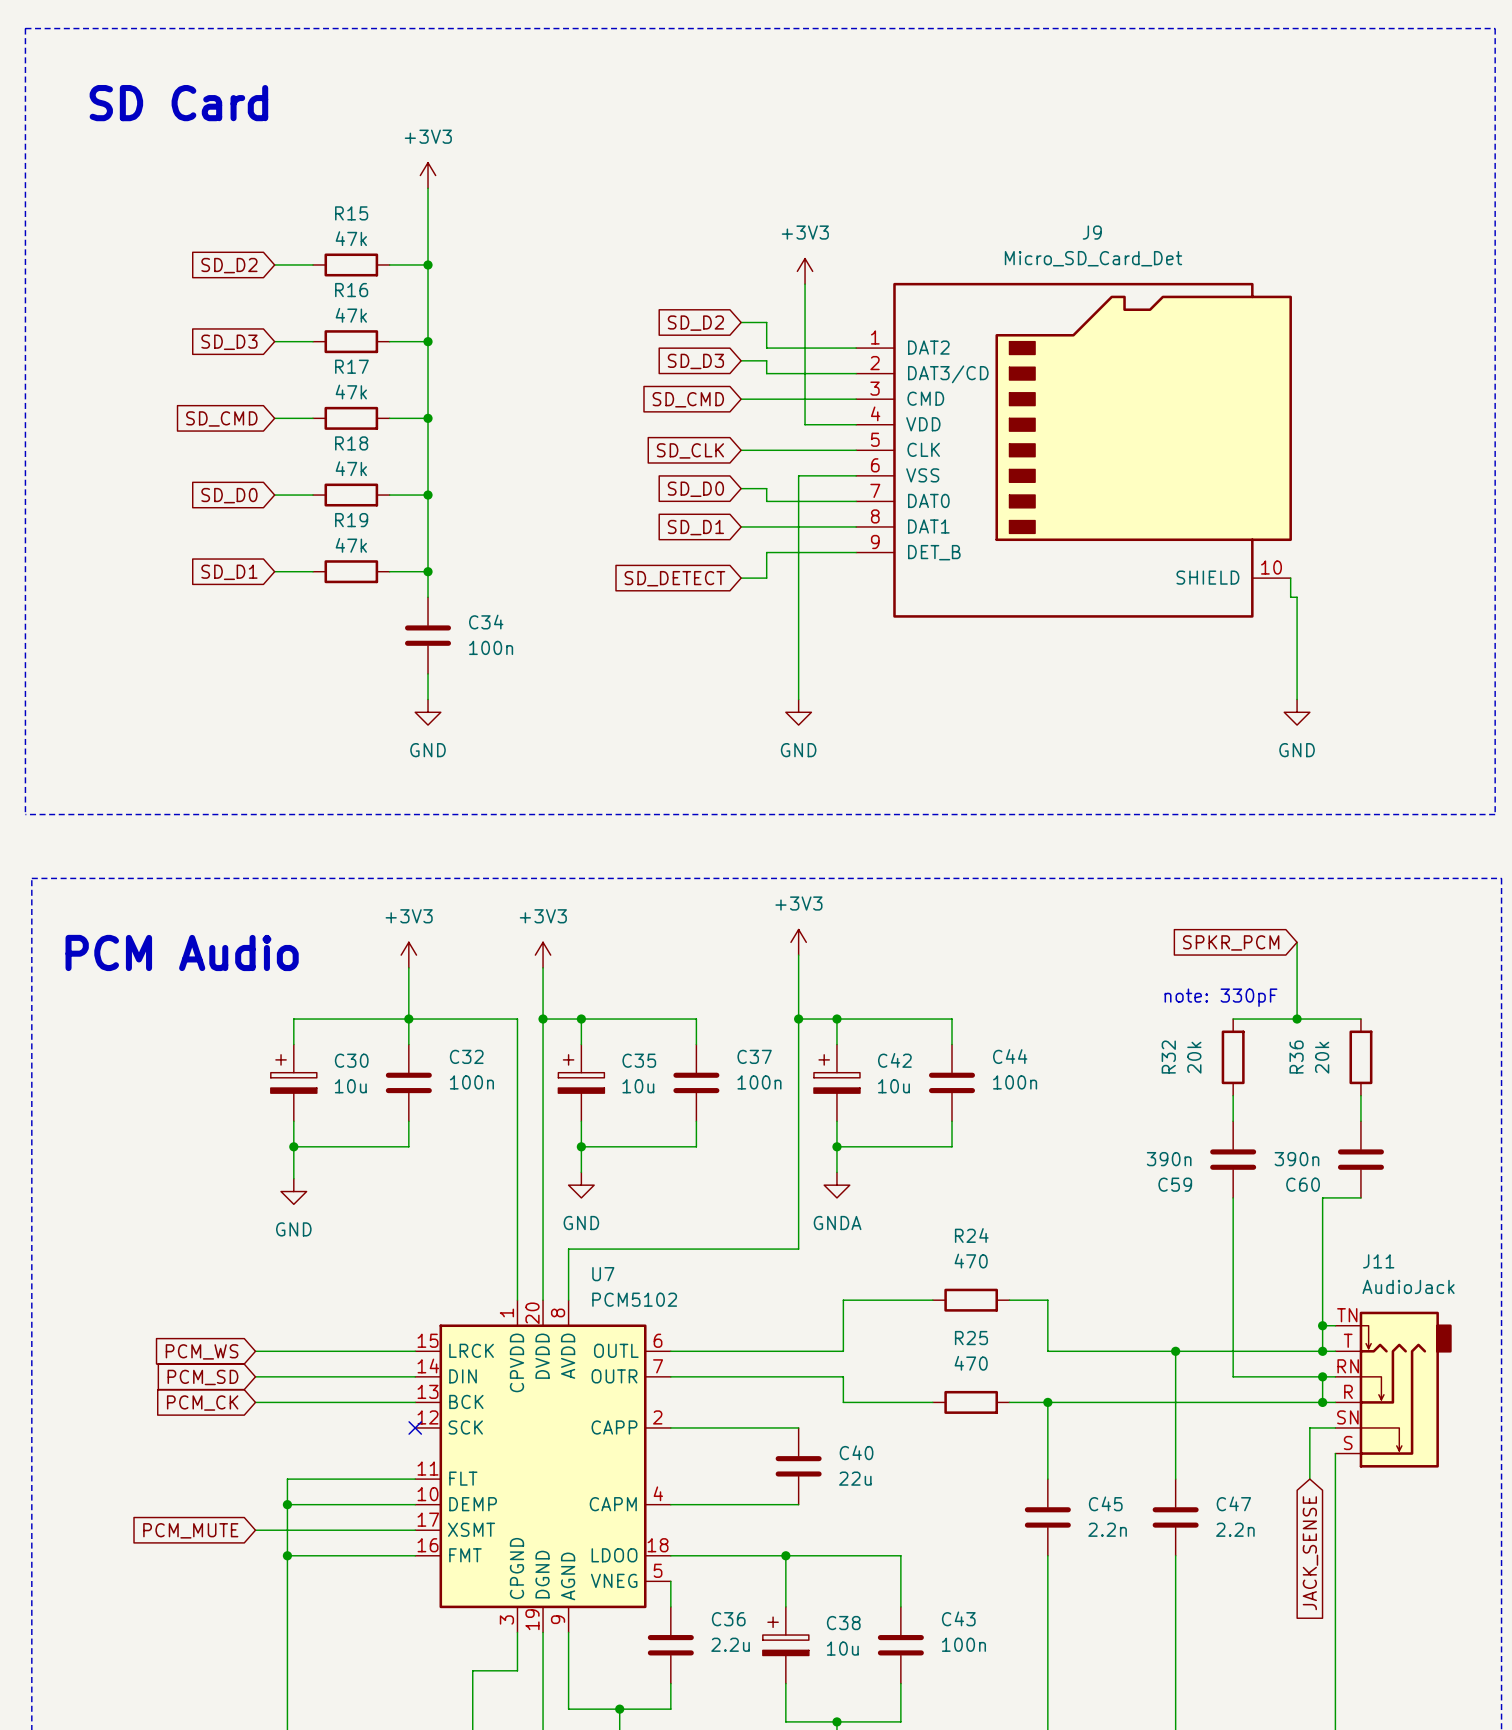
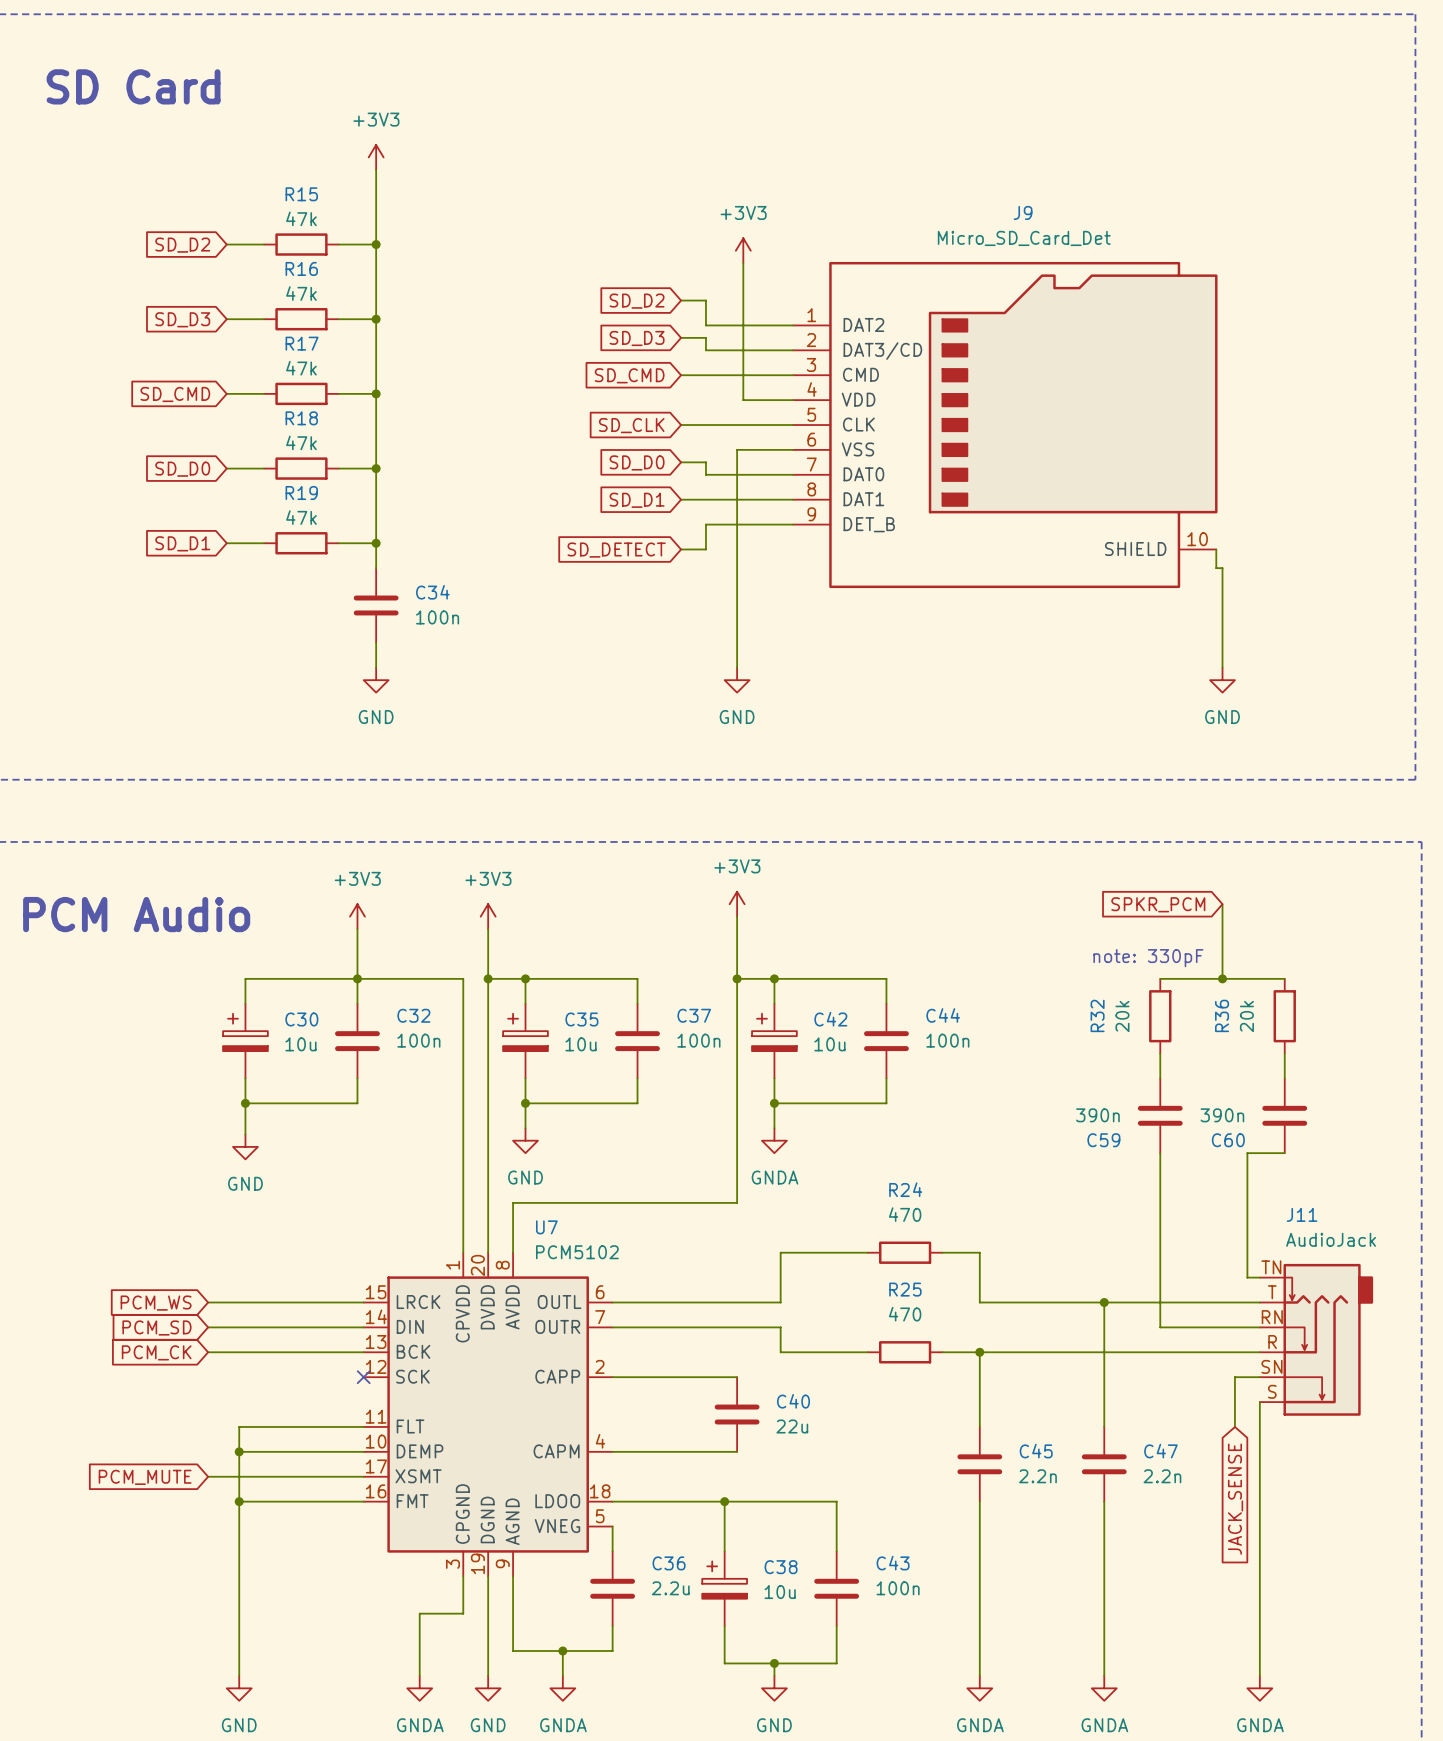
wire: (1322, 1325) (1322, 1351) -> none
junction: (1322, 1325) -> none
junction: (1322, 1351) -> none
wire: (1322, 1376) (1322, 1402) -> none
junction: (1322, 1376) -> none
junction: (1322, 1402) -> none

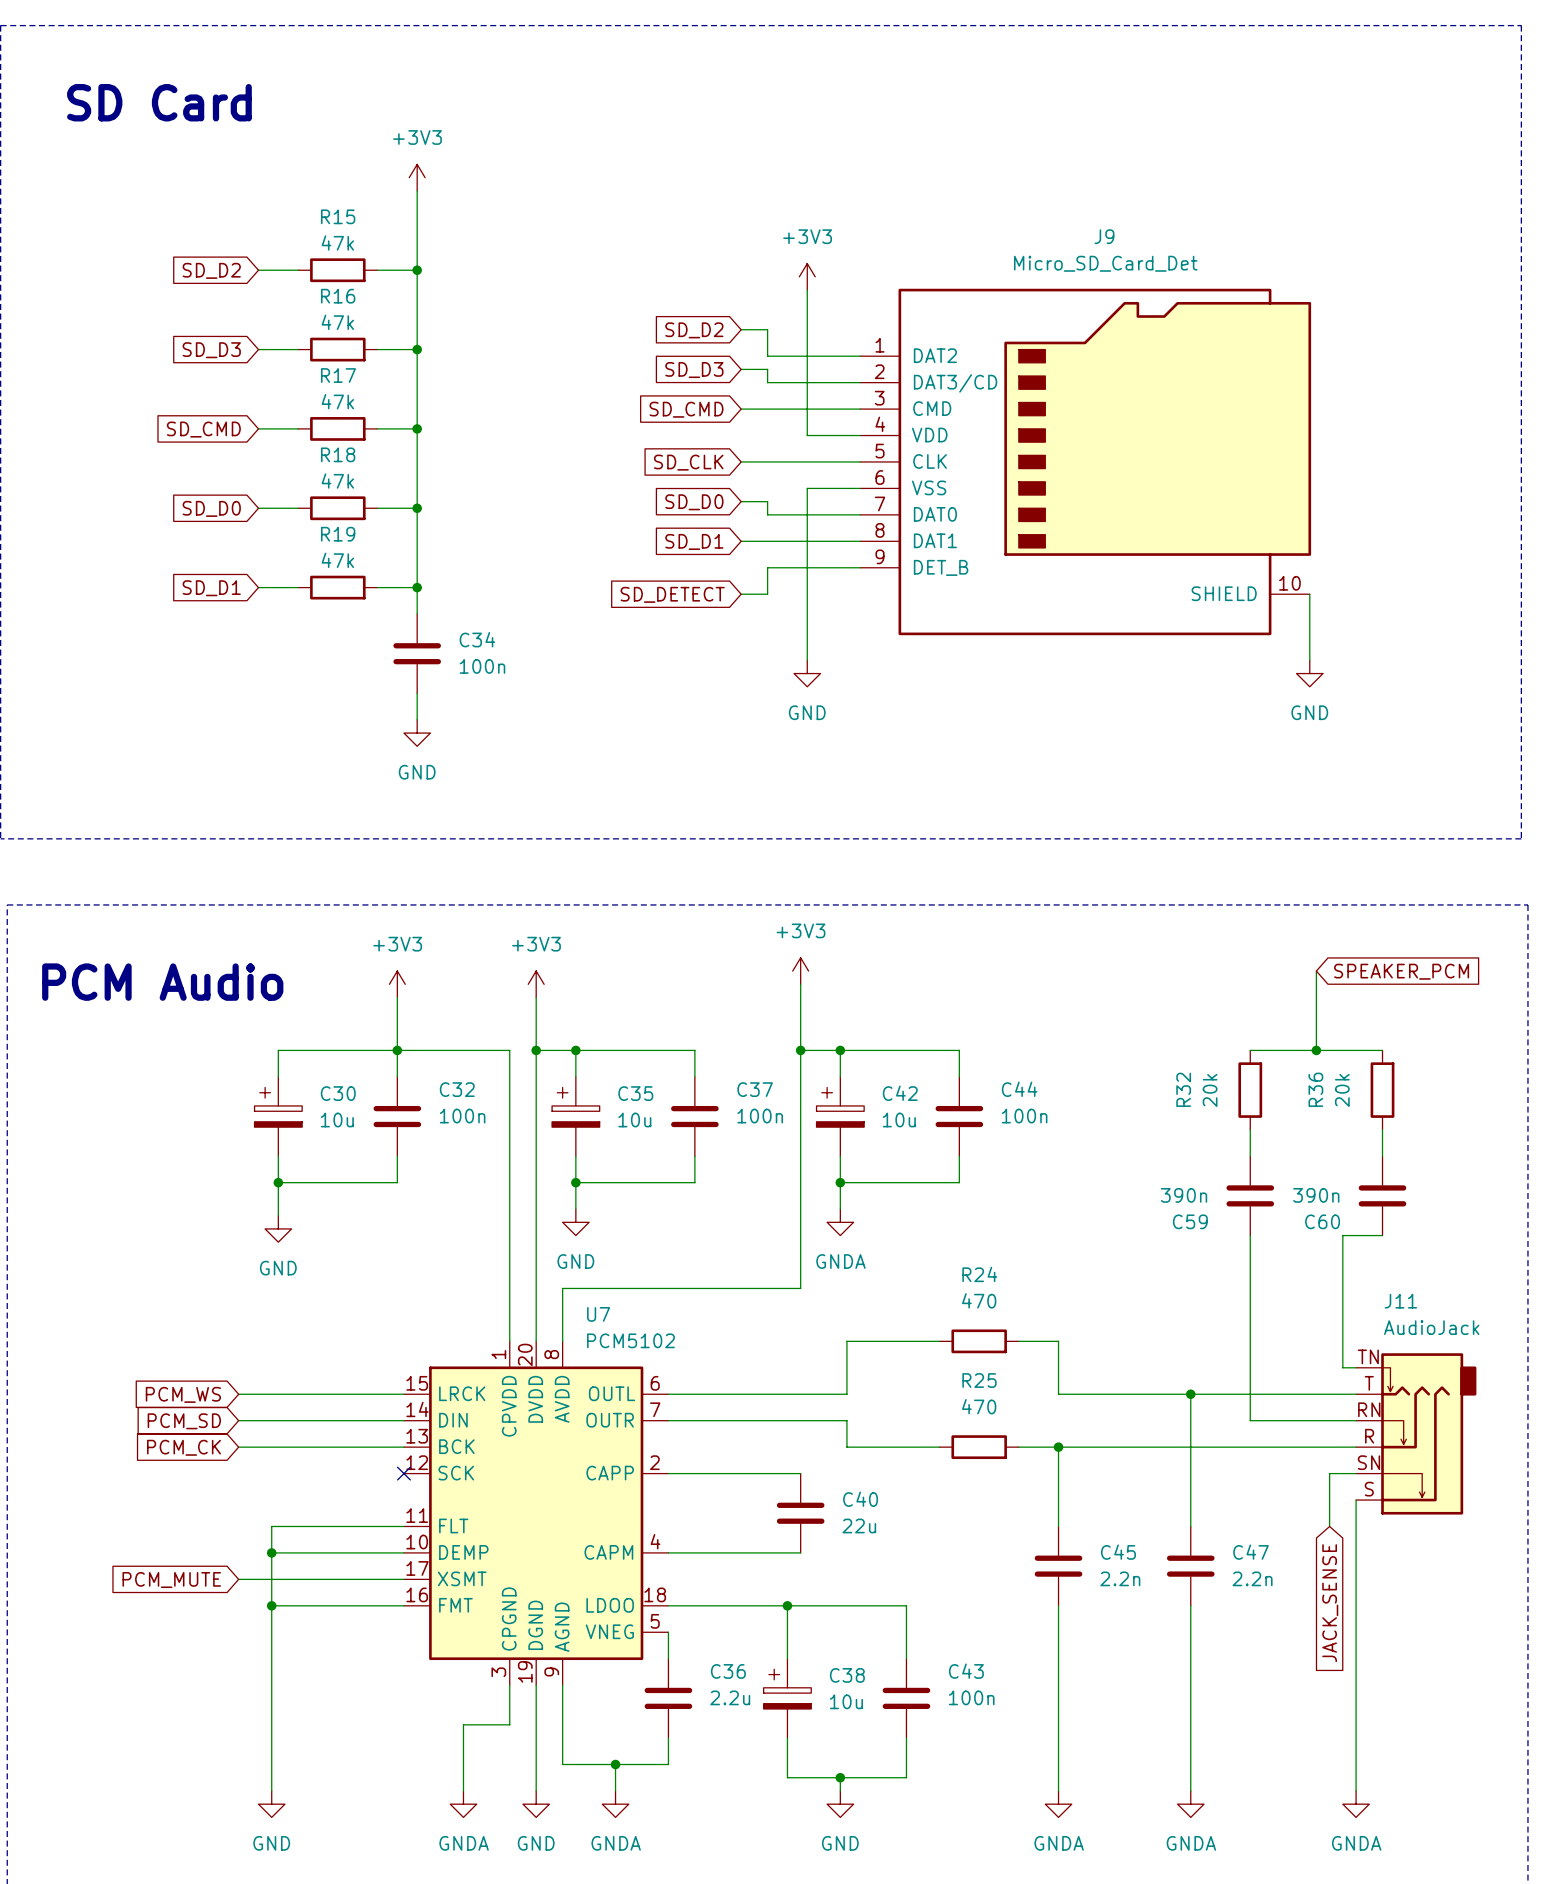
wire: (743, 449) (737, 449) (737, 667) -> (807, 488) (807, 660)
wire: (1216, 568) (1222, 568) (1222, 667) -> (1309, 614) (1309, 660)
power symbol position: GND (737, 680) -> GND (807, 673)
power symbol position: GND (1222, 680) -> GND (1309, 673)
global label: SPKR_PCM (1158, 904) -> SPEAKER_PCM (1401, 971)
text: note: 330pF (1148, 958) -> none

